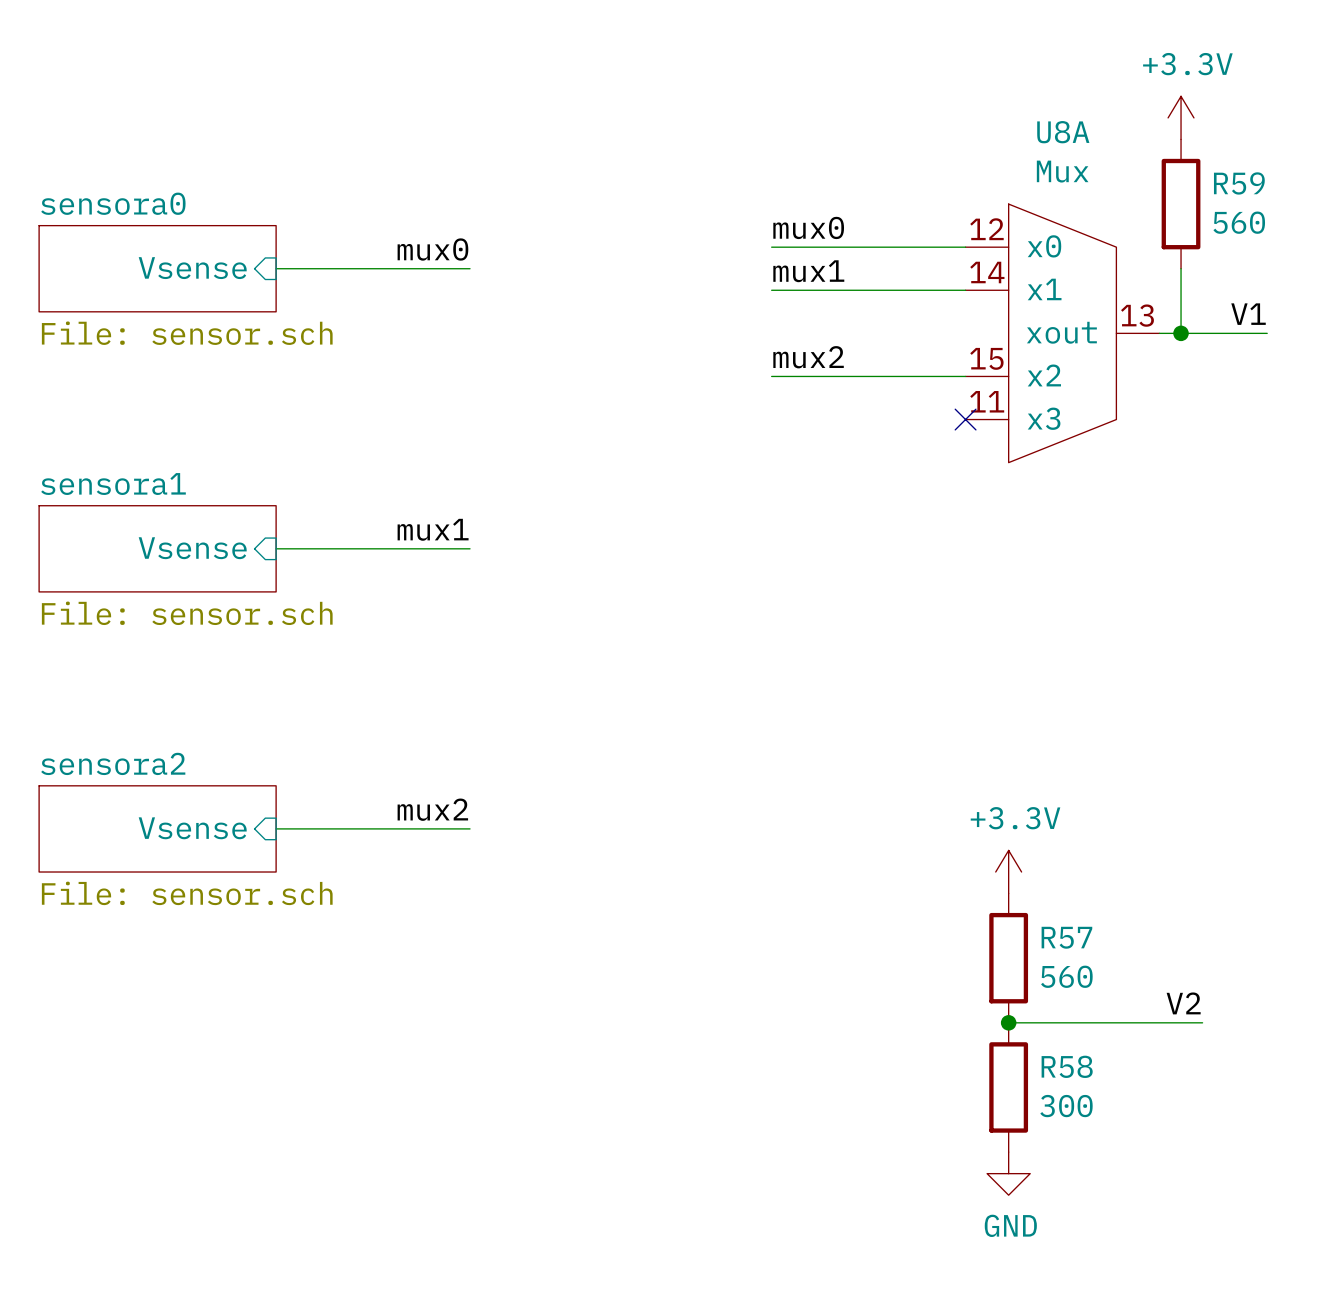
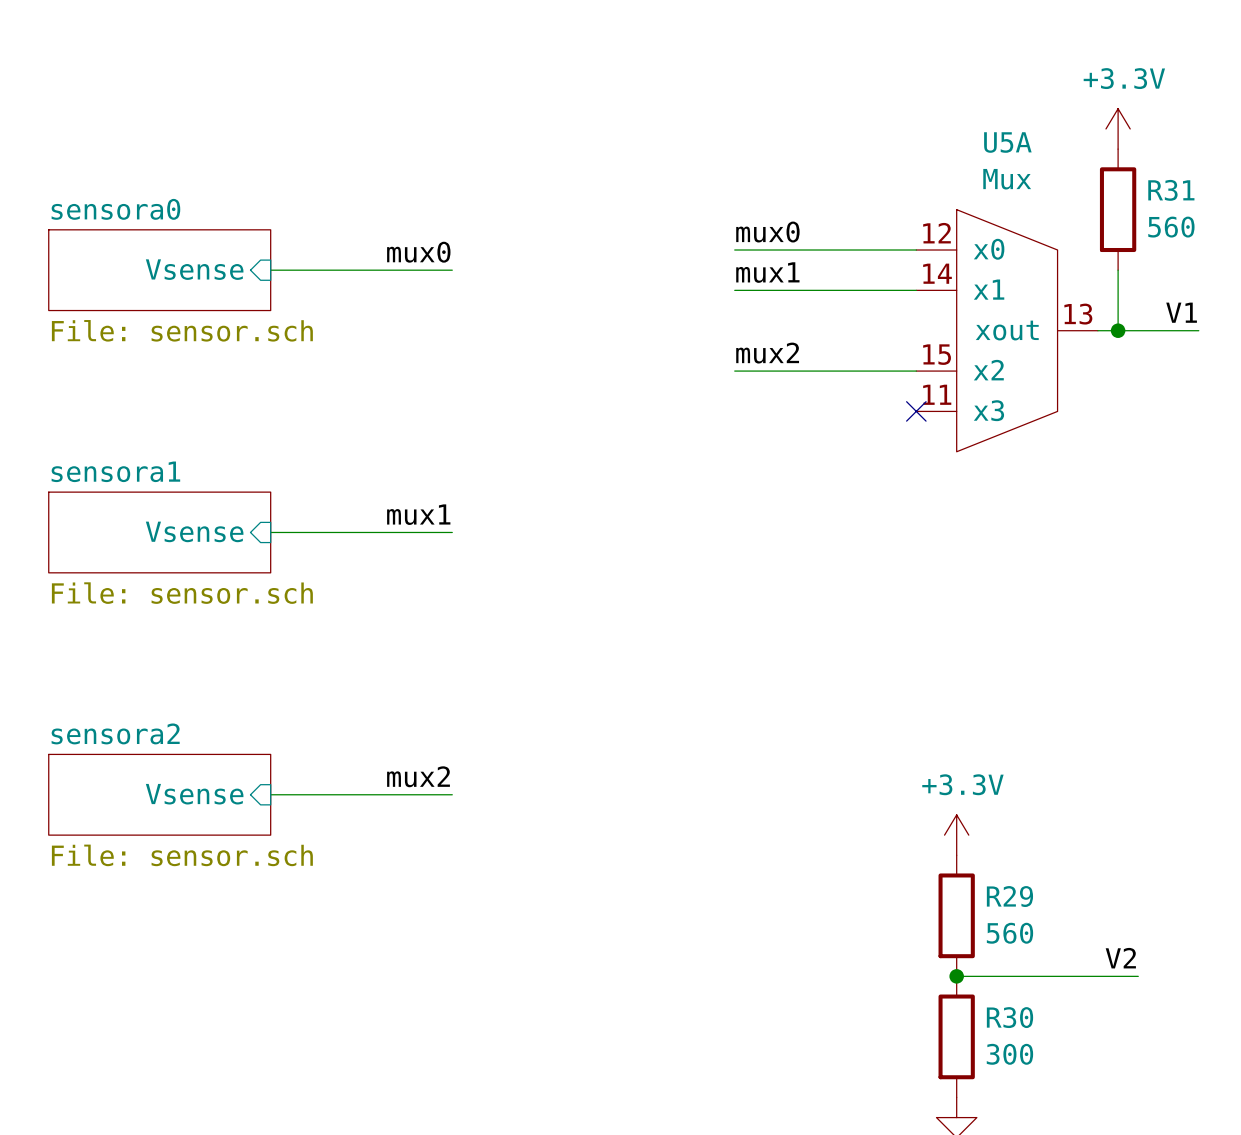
U8A name: U8A (1063, 132) -> U5A (1007, 142)
R59 name: R59 (1239, 183) -> R31 (1171, 190)
R57 name: R57 (1066, 937) -> R29 (1009, 896)
R58 name: R58 (1067, 1066) -> R30 (1009, 1017)

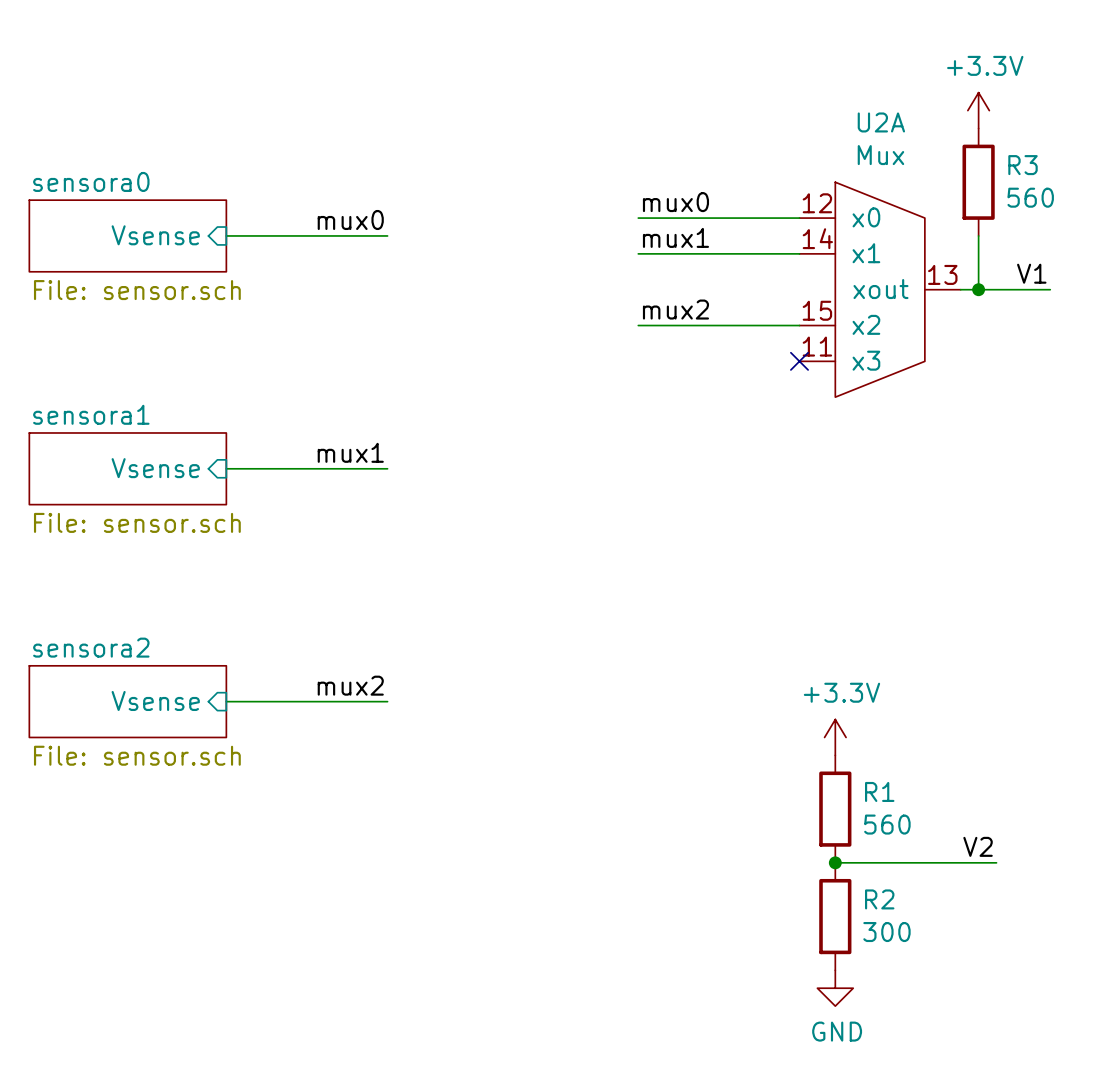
U5A name: U5A (1007, 142) -> U2A (881, 122)
R31 name: R31 (1171, 190) -> R3 (1023, 165)
R29 name: R29 (1009, 896) -> R1 (879, 791)
R30 name: R30 (1009, 1017) -> R2 (879, 899)

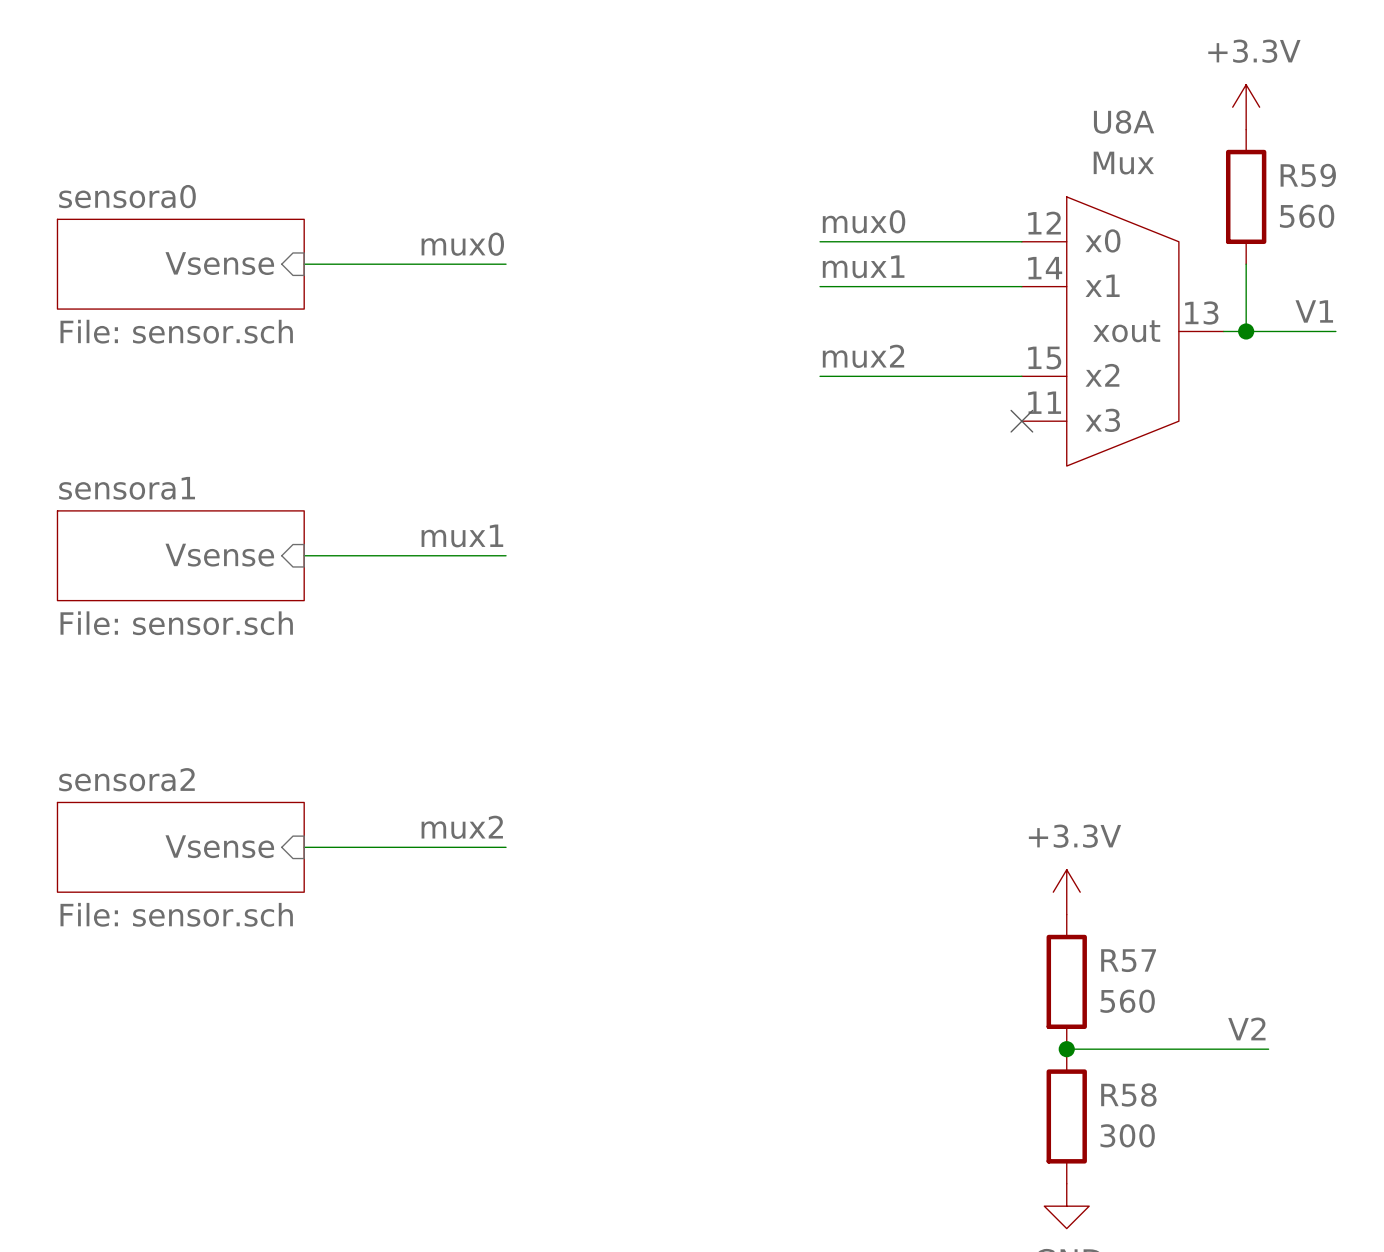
U2A name: U2A (881, 122) -> U8A (1124, 122)
R3 name: R3 (1023, 165) -> R59 (1308, 175)
R1 name: R1 (879, 791) -> R57 (1128, 960)
R2 name: R2 (879, 899) -> R58 (1128, 1095)

